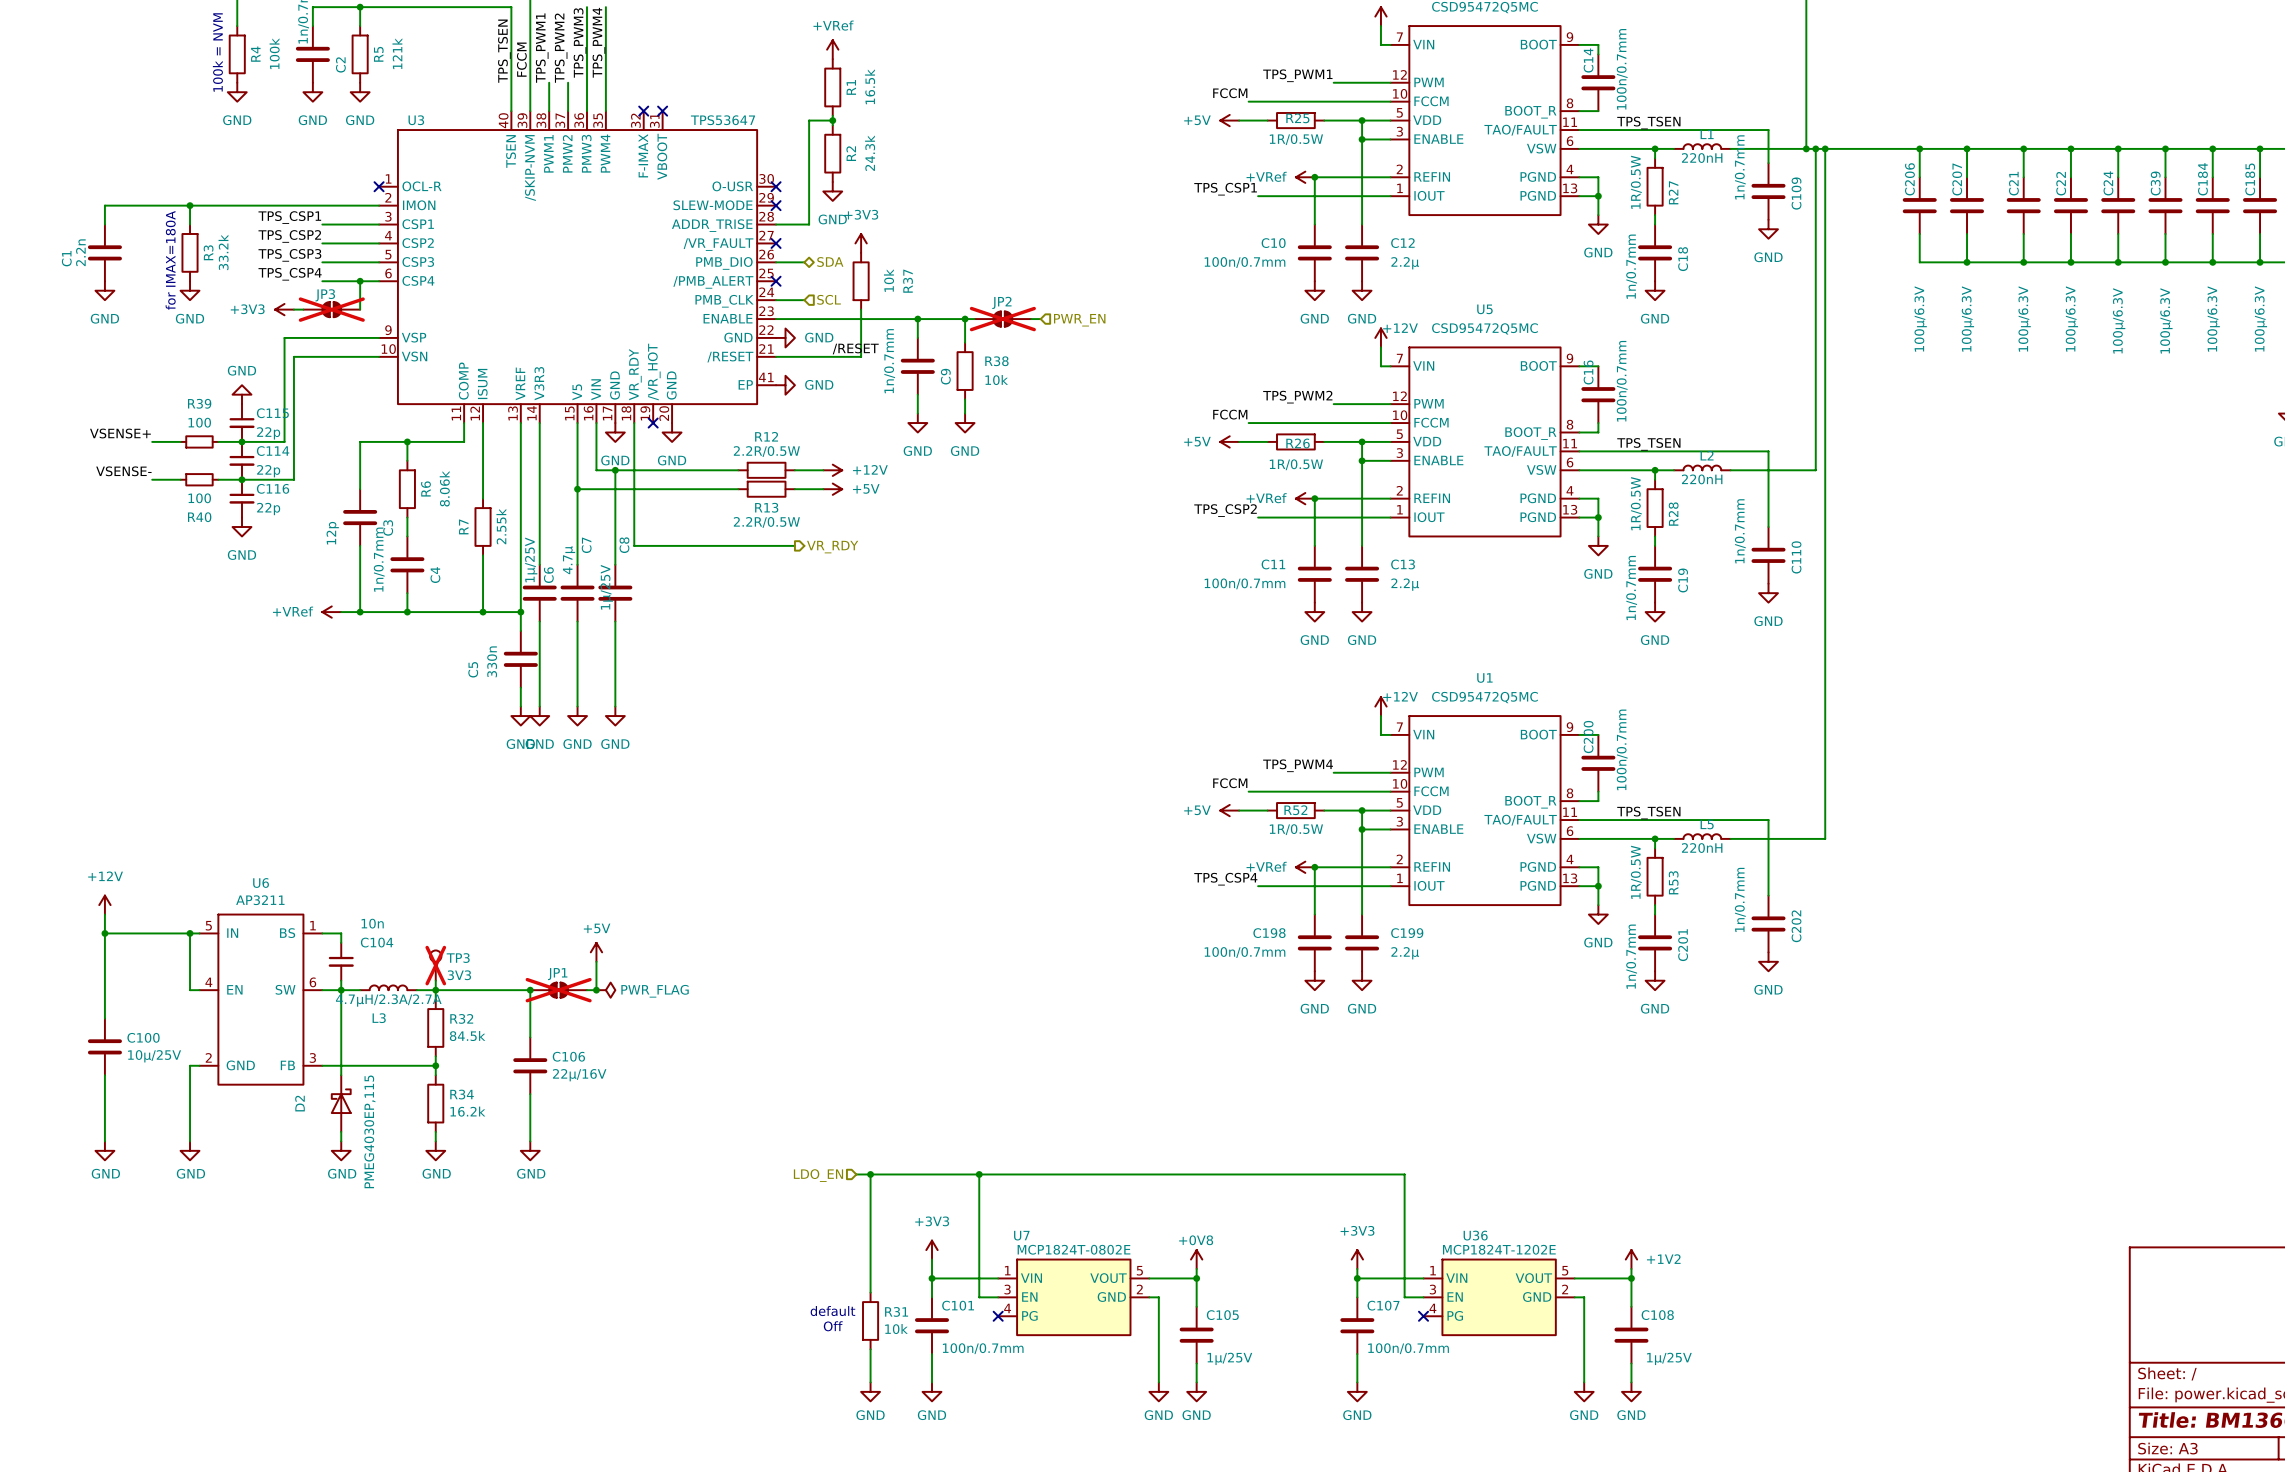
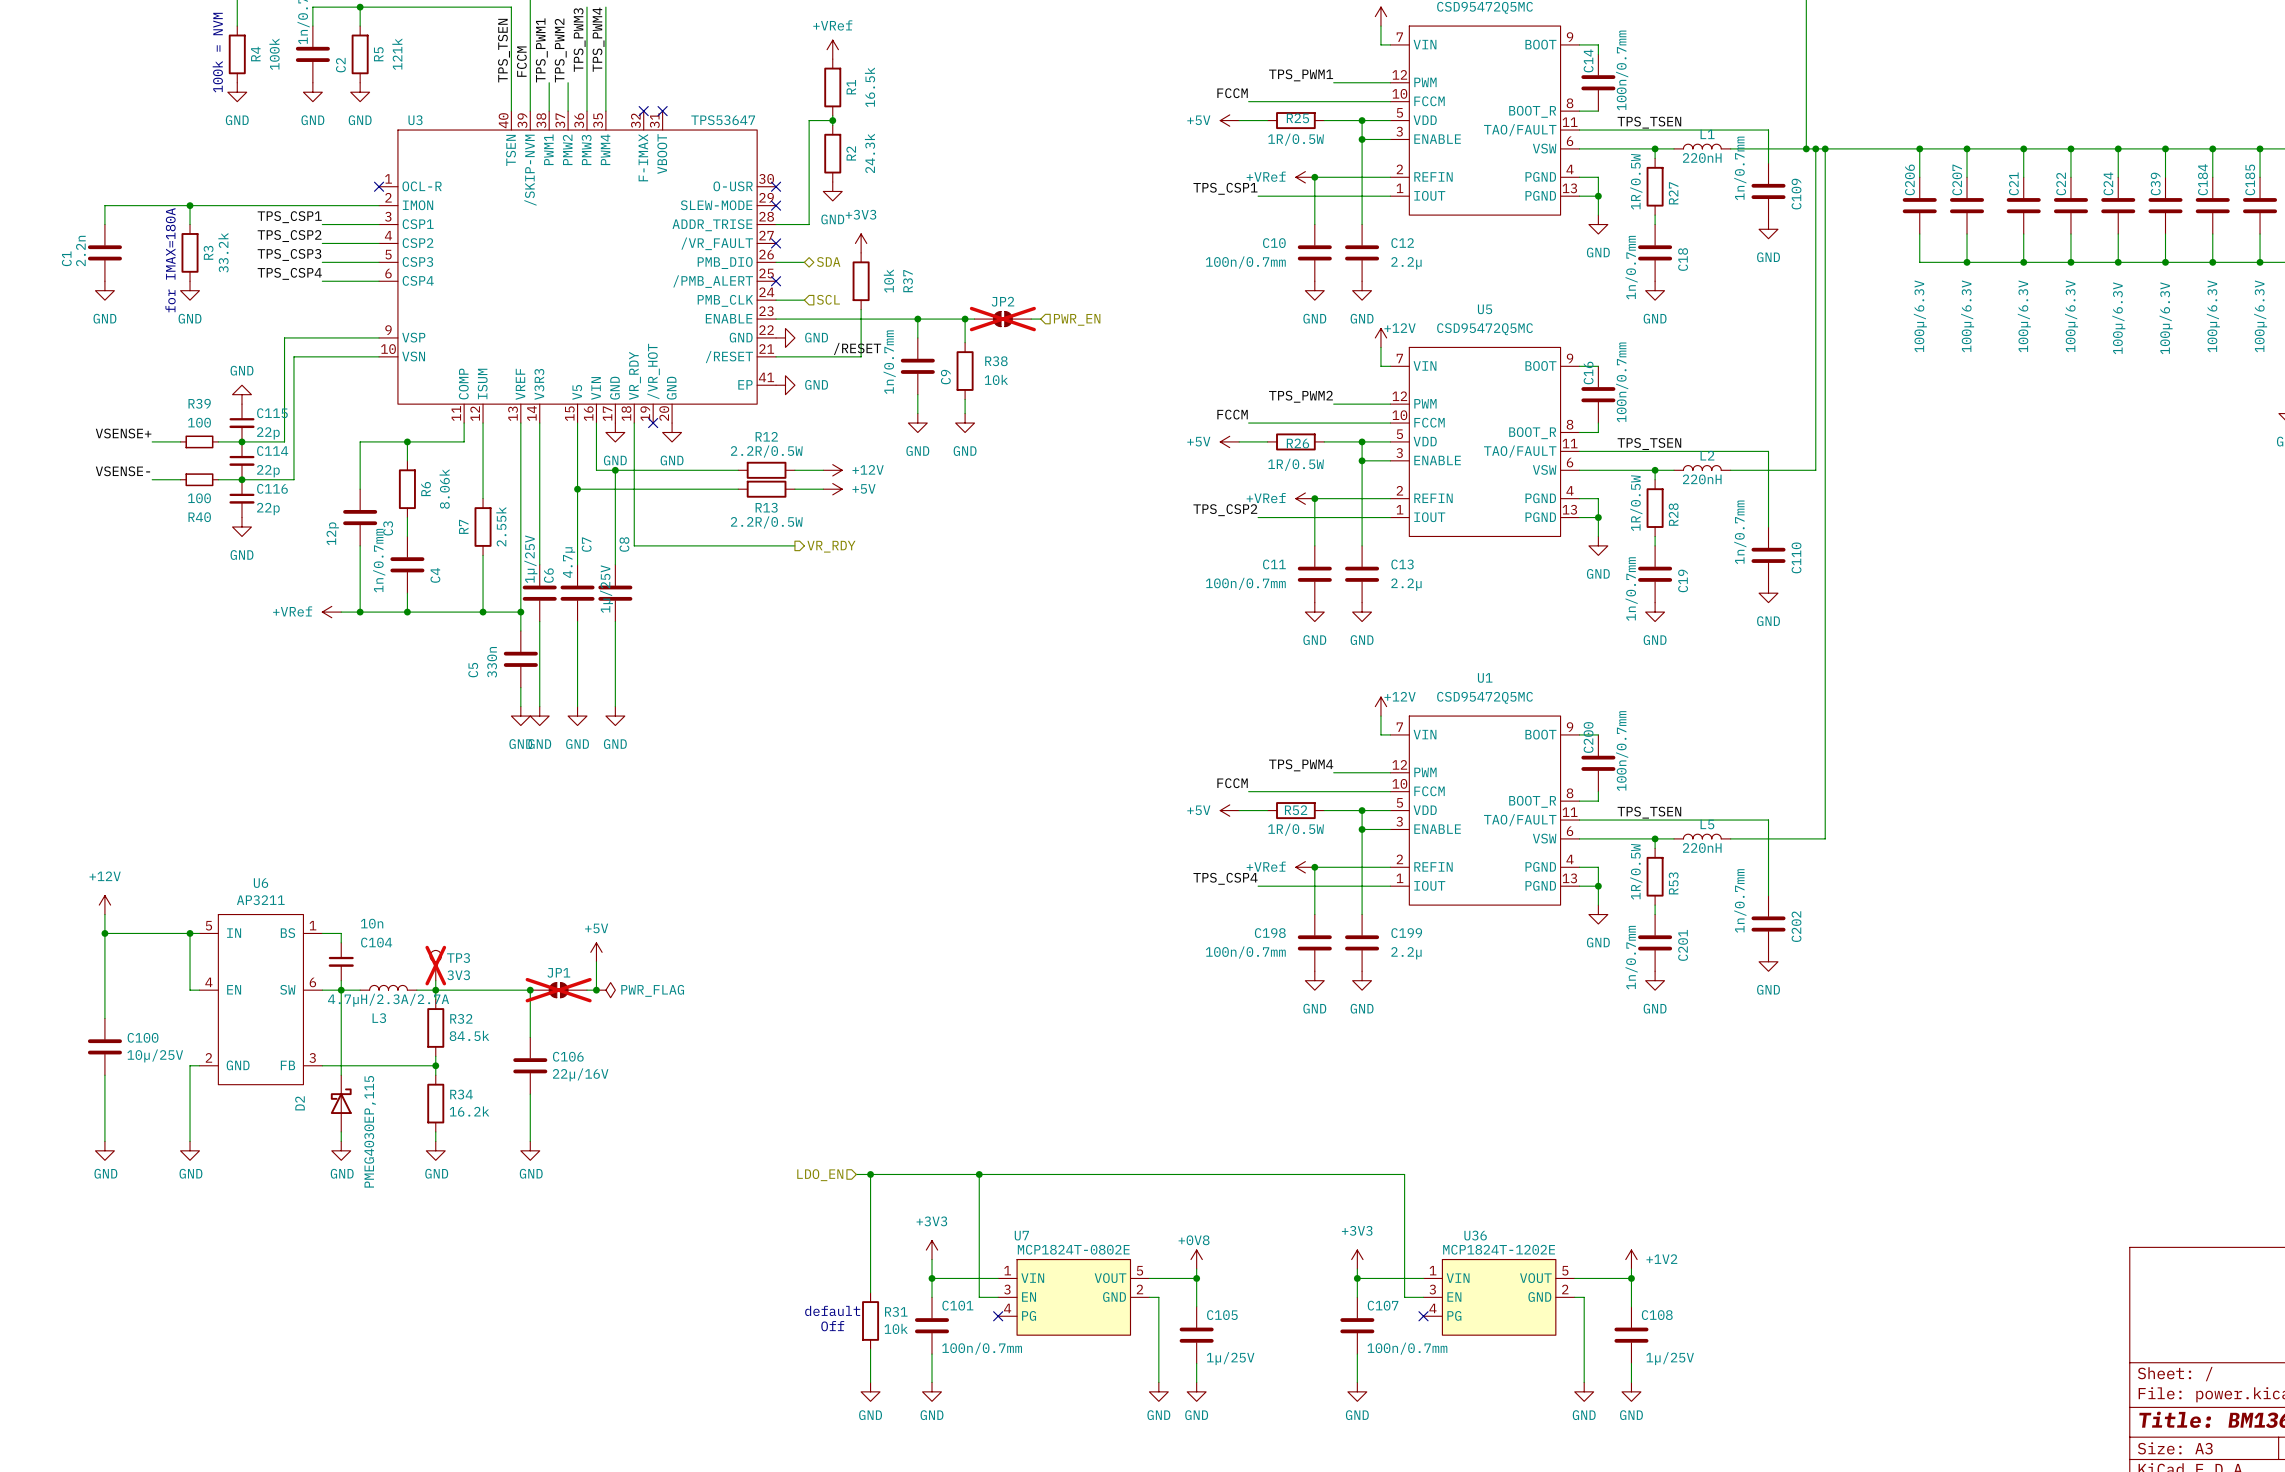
wire: (360, 281) (360, 309) -> none
junction: (360, 281) -> none
power symbol: +3V3 (284, 309) -> none
wire: (293, 309) (303, 309) -> none
JP3: (331, 309) -> none

